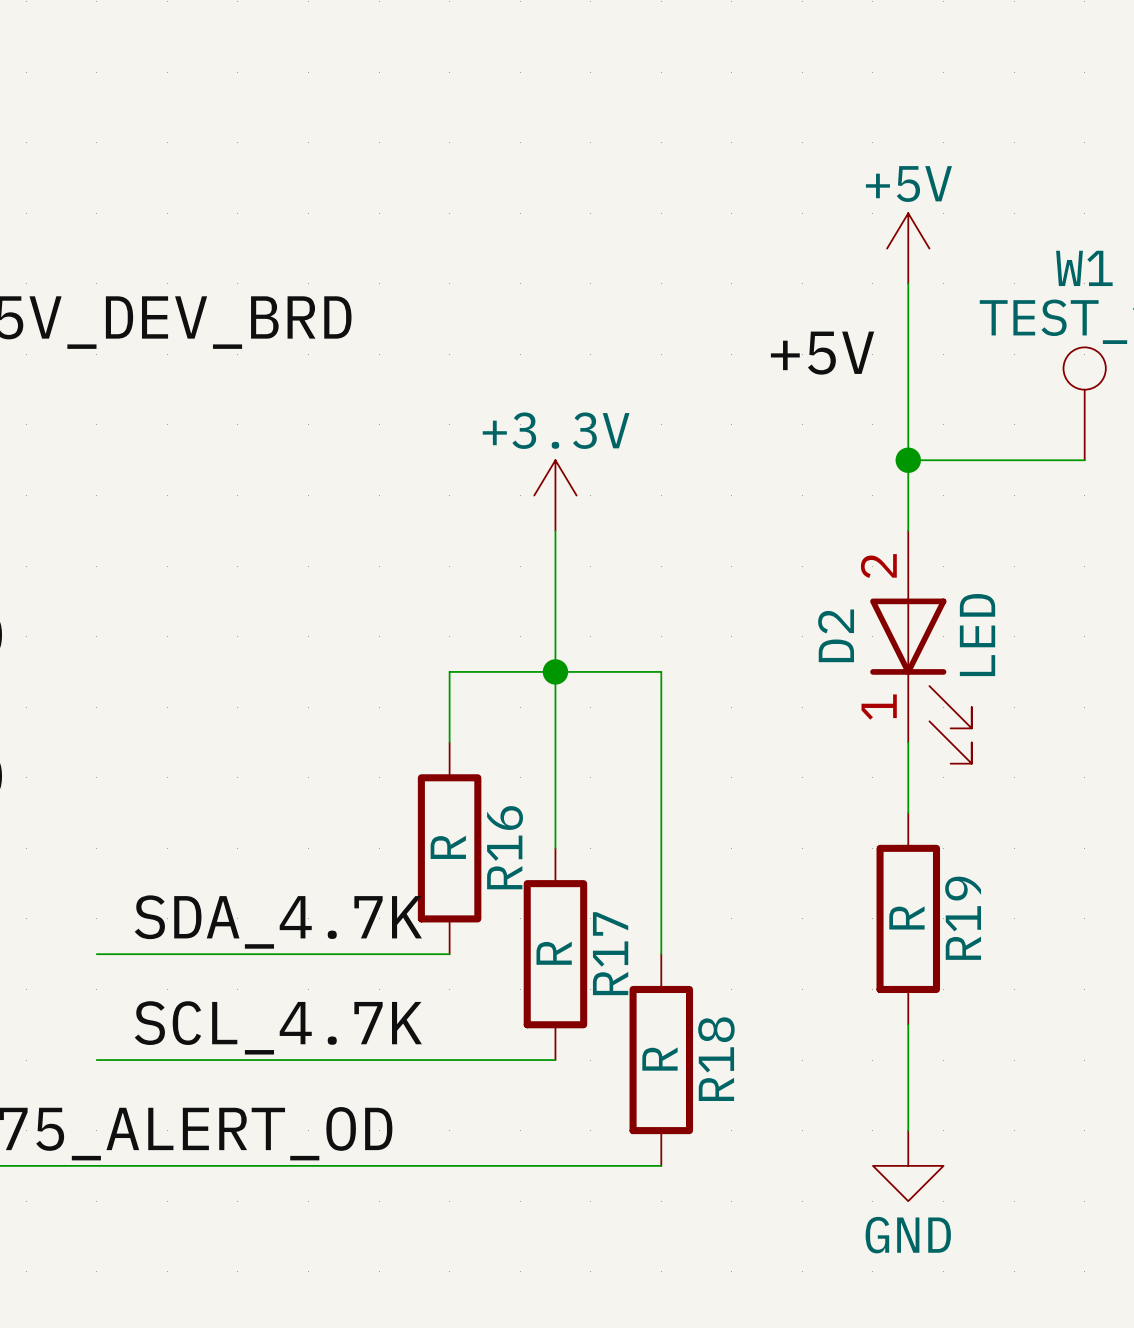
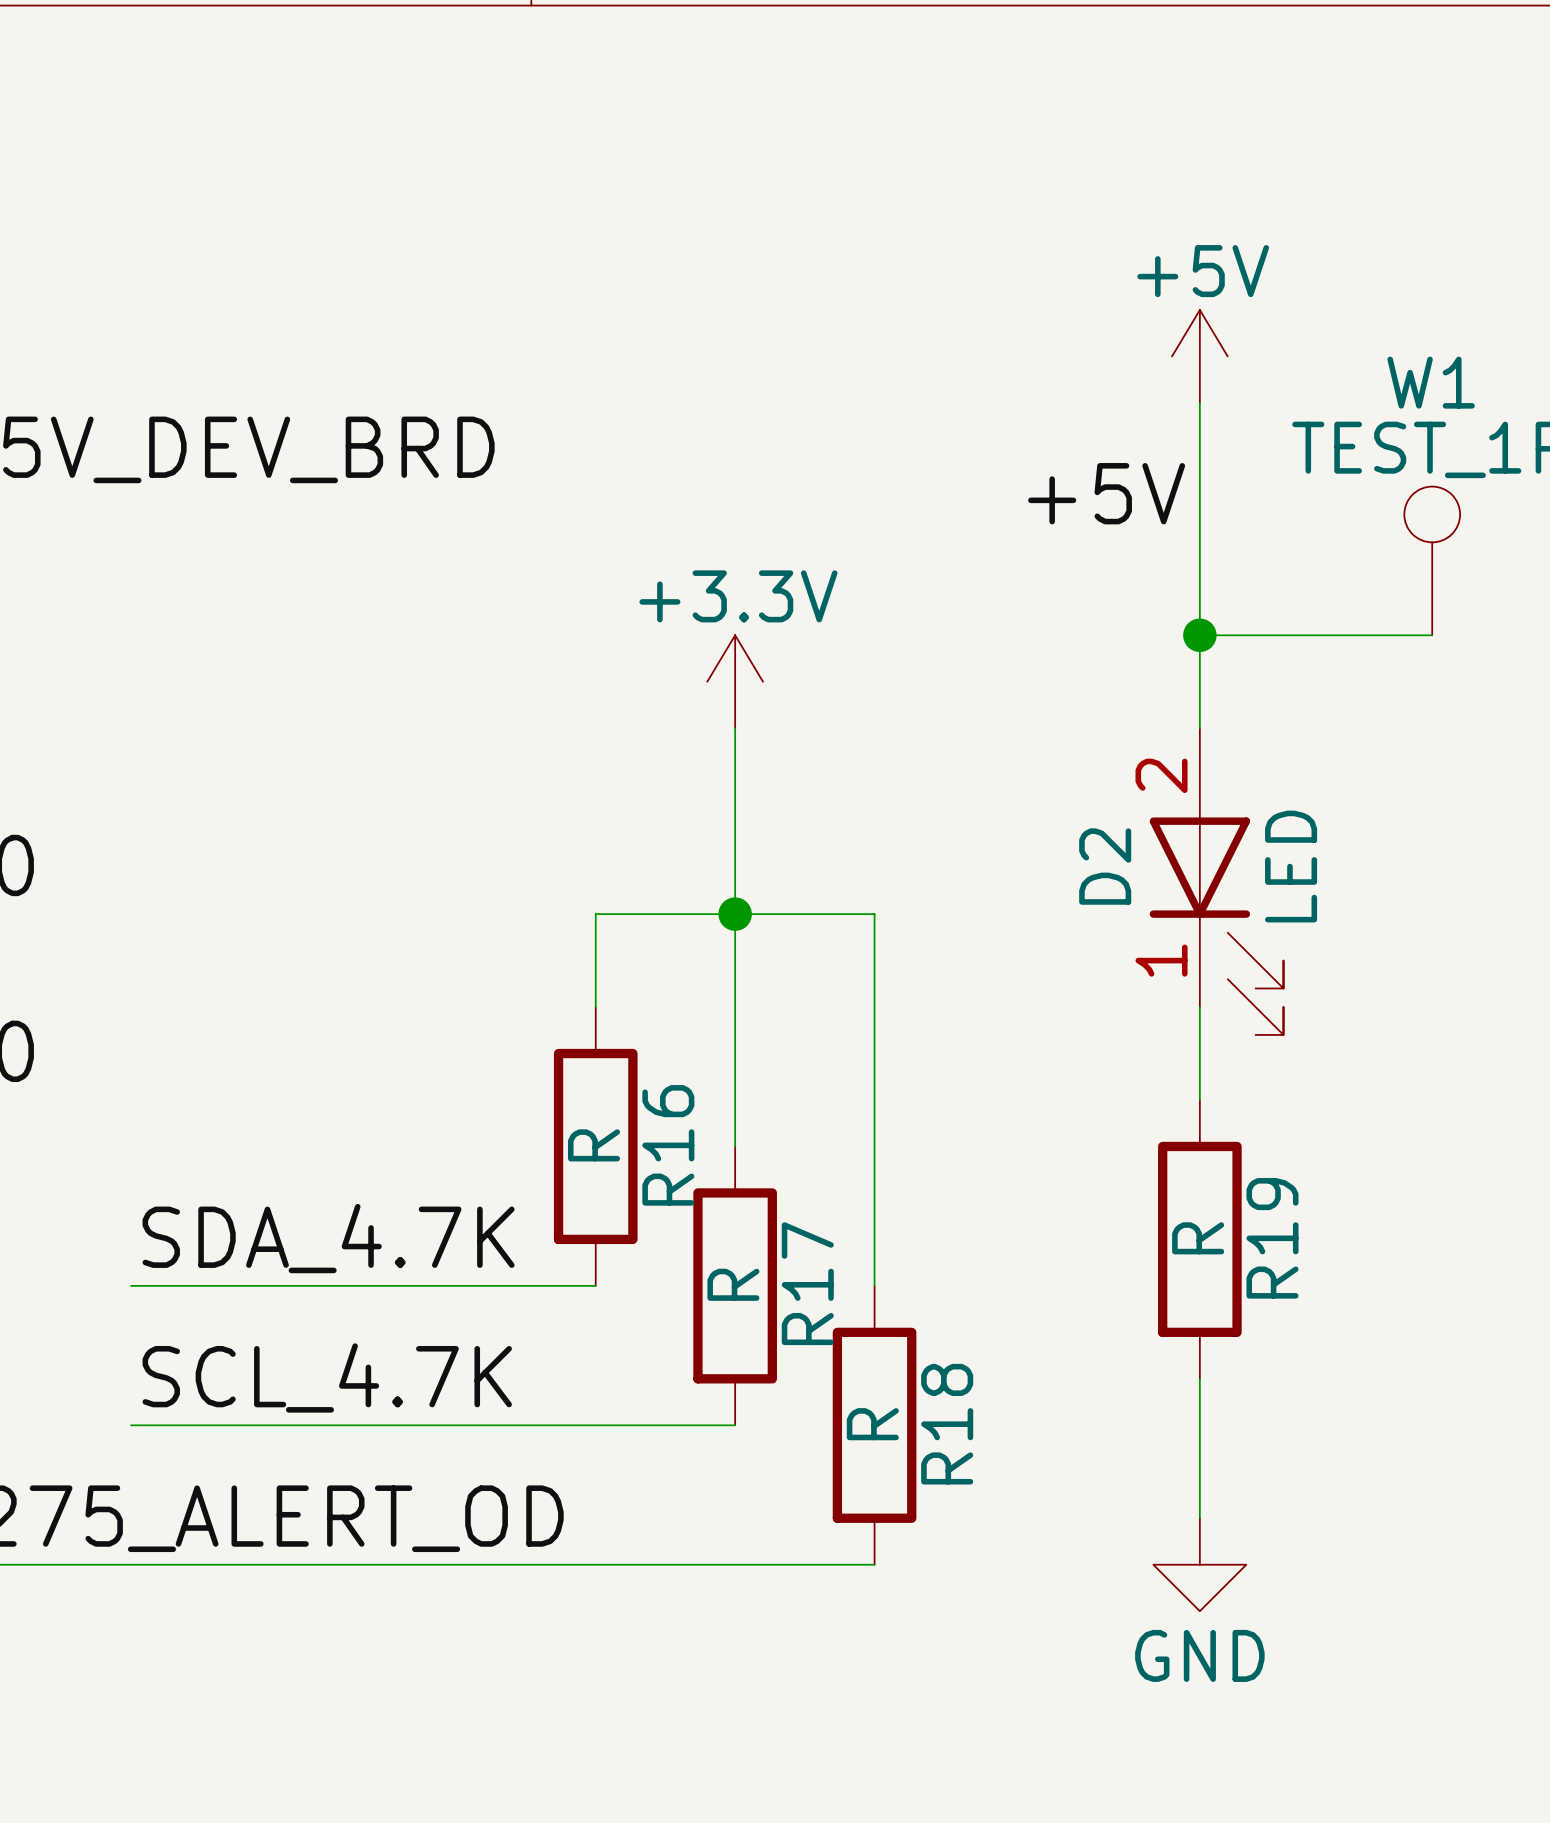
label position: SDA_4.7K (278, 922) -> SDA_4.7K (328, 1238)
label position: SCL_4.7K (278, 1027) -> SCL_4.7K (327, 1377)

